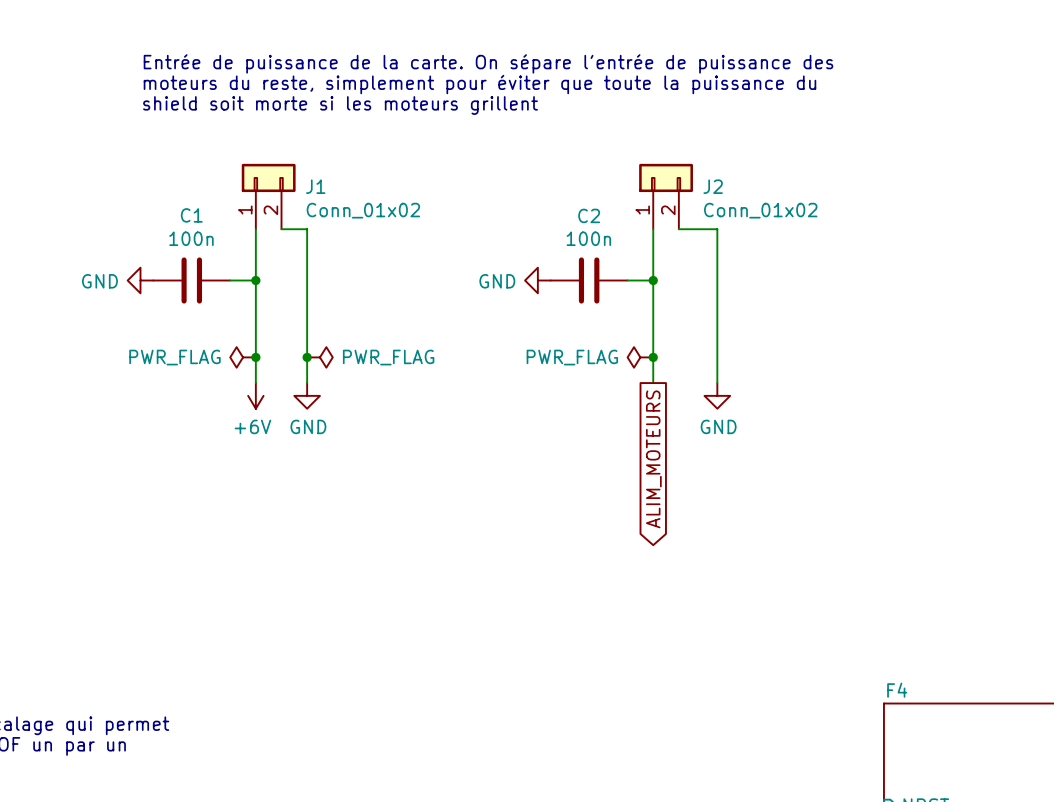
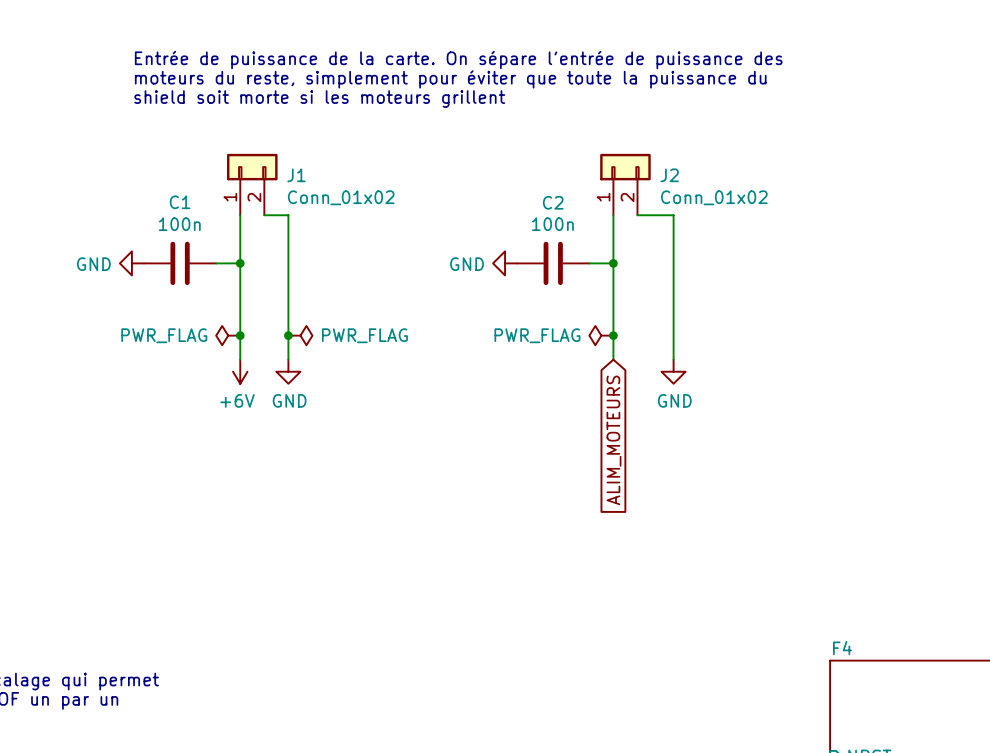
global label shape: output (653, 459) -> input (613, 440)

